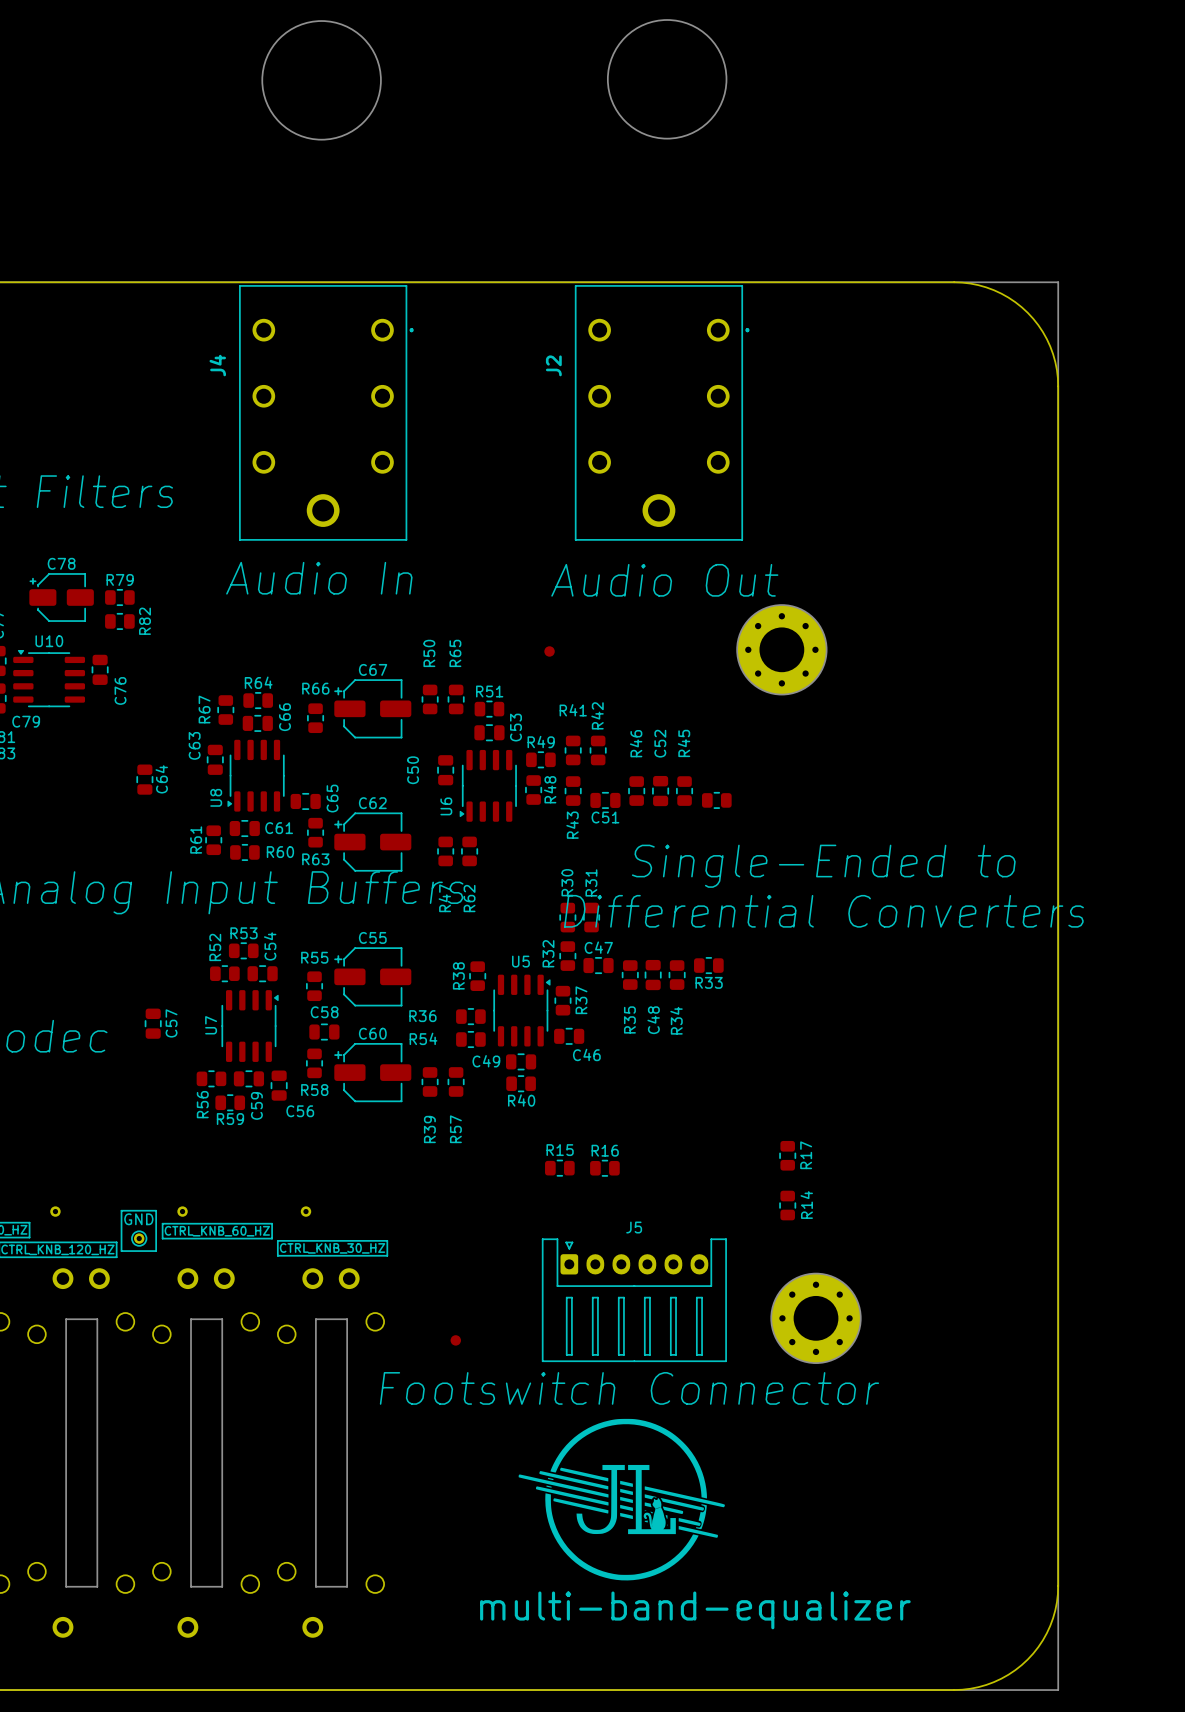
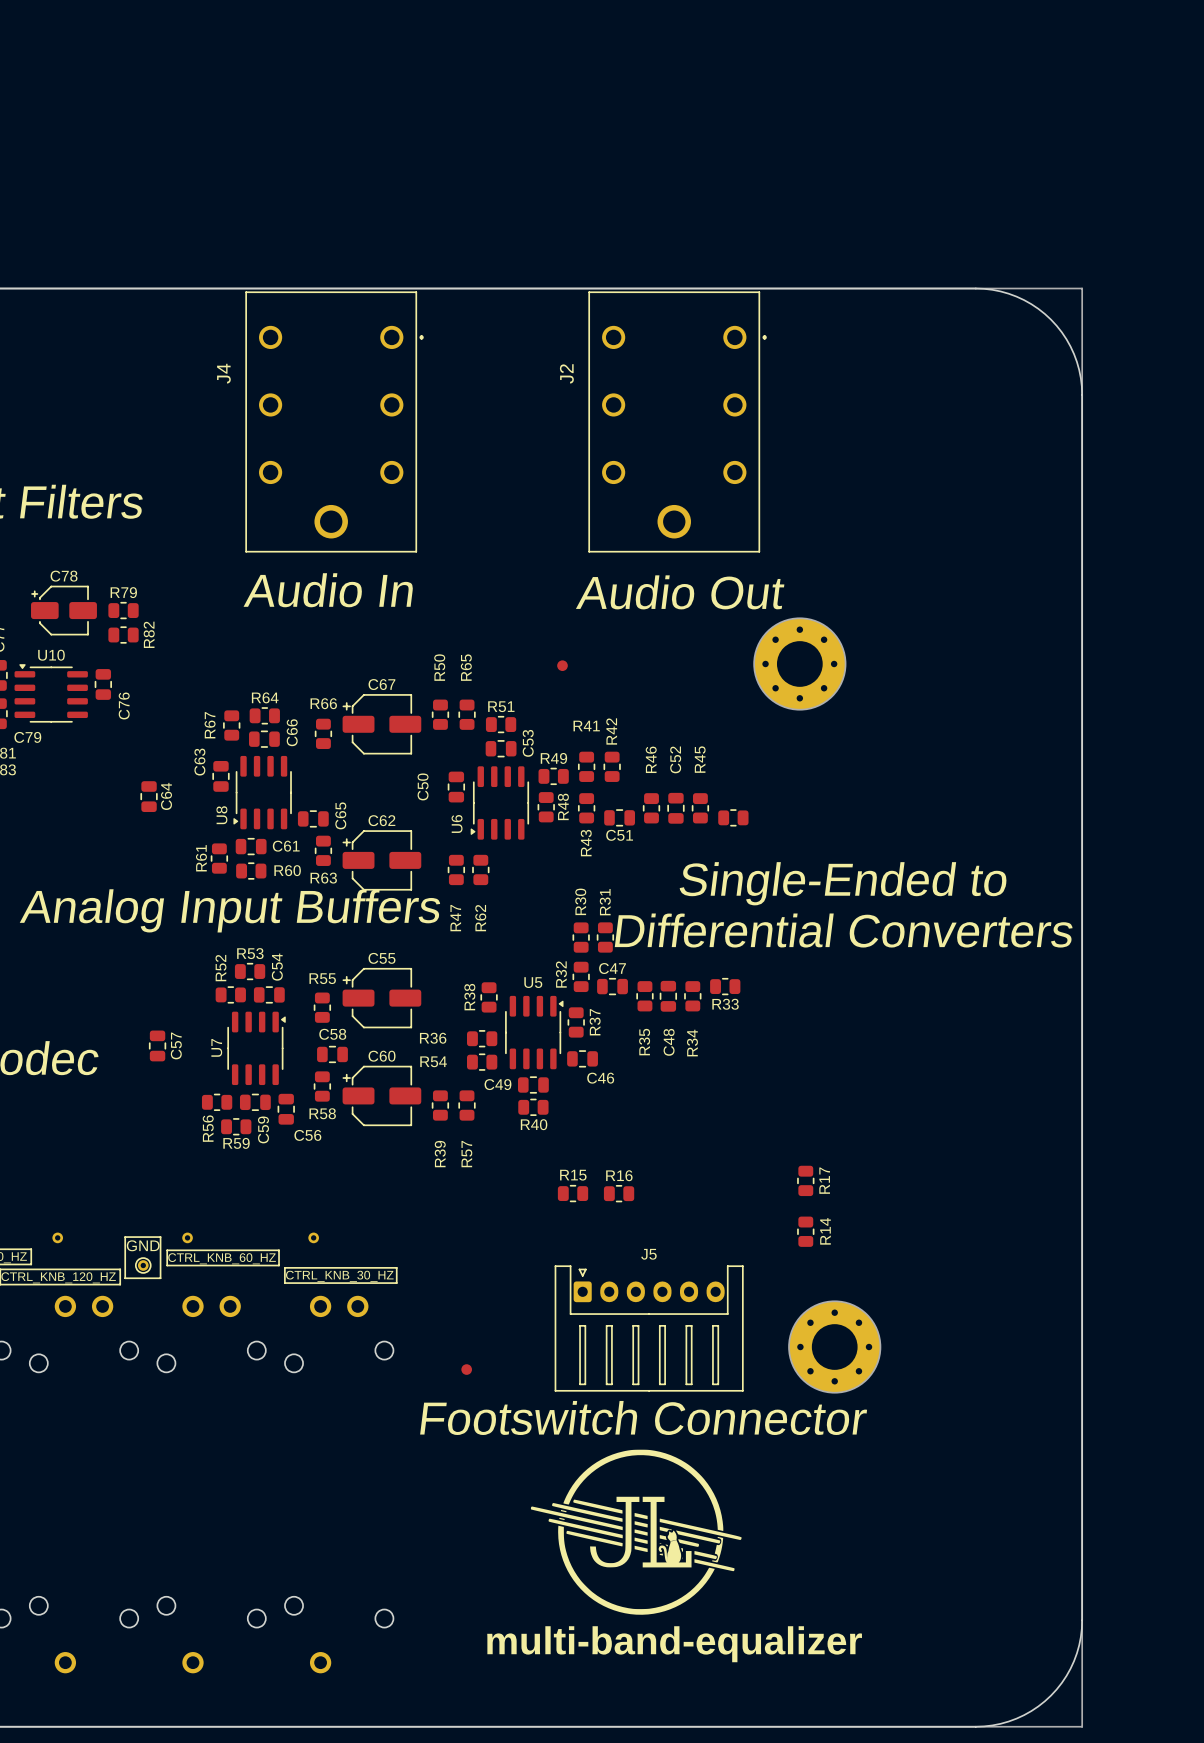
drawing: [607, 19, 728, 140] -> none
drawing: [261, 20, 382, 141] -> none
line: (66, 1319) (97, 1319) (97, 1586) (66, 1586) (66, 1319) -> none
line: (191, 1319) (222, 1319) (222, 1586) (191, 1586) (191, 1319) -> none
line: (315, 1319) (347, 1319) (347, 1586) (315, 1586) (315, 1319) -> none

